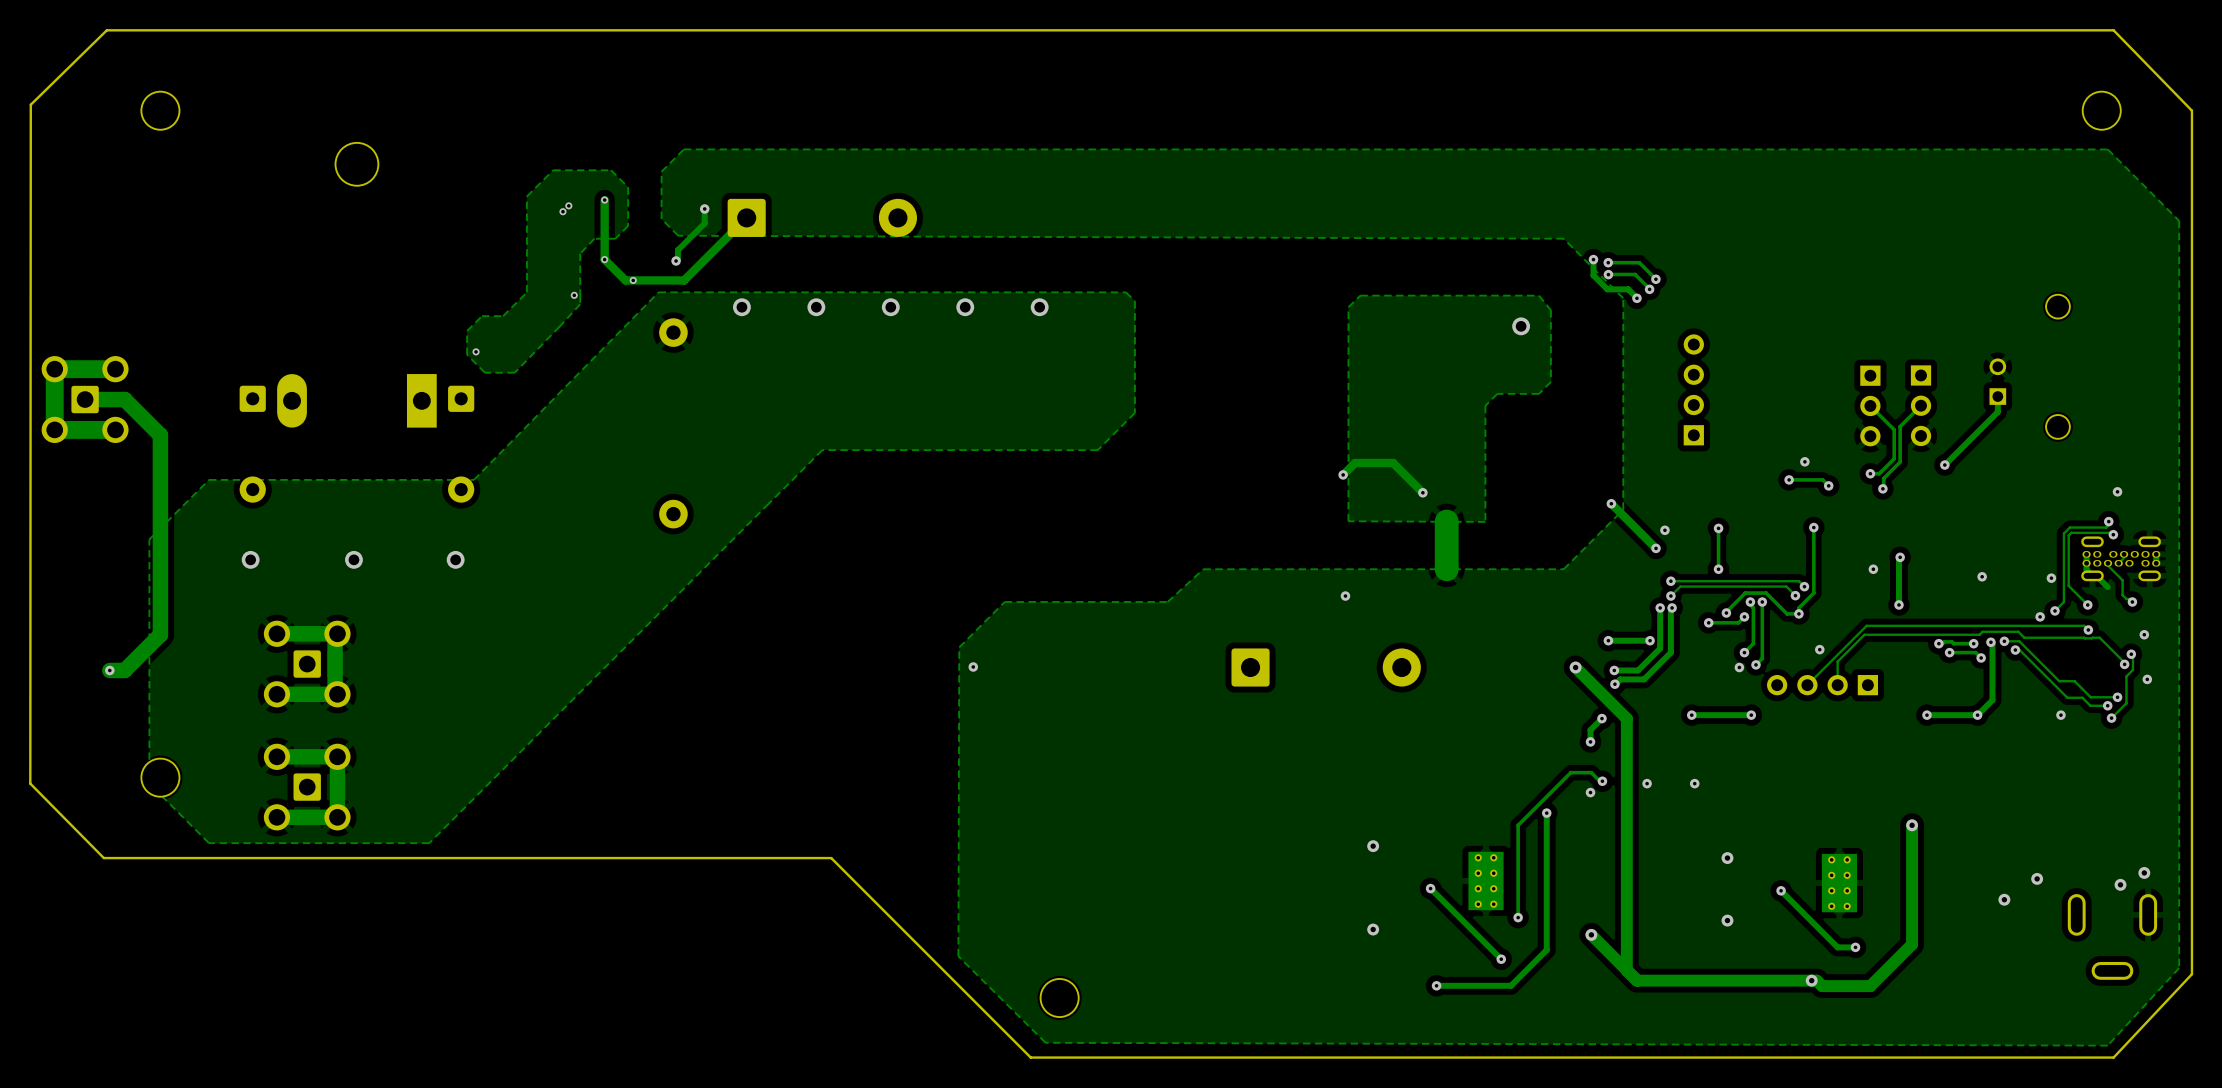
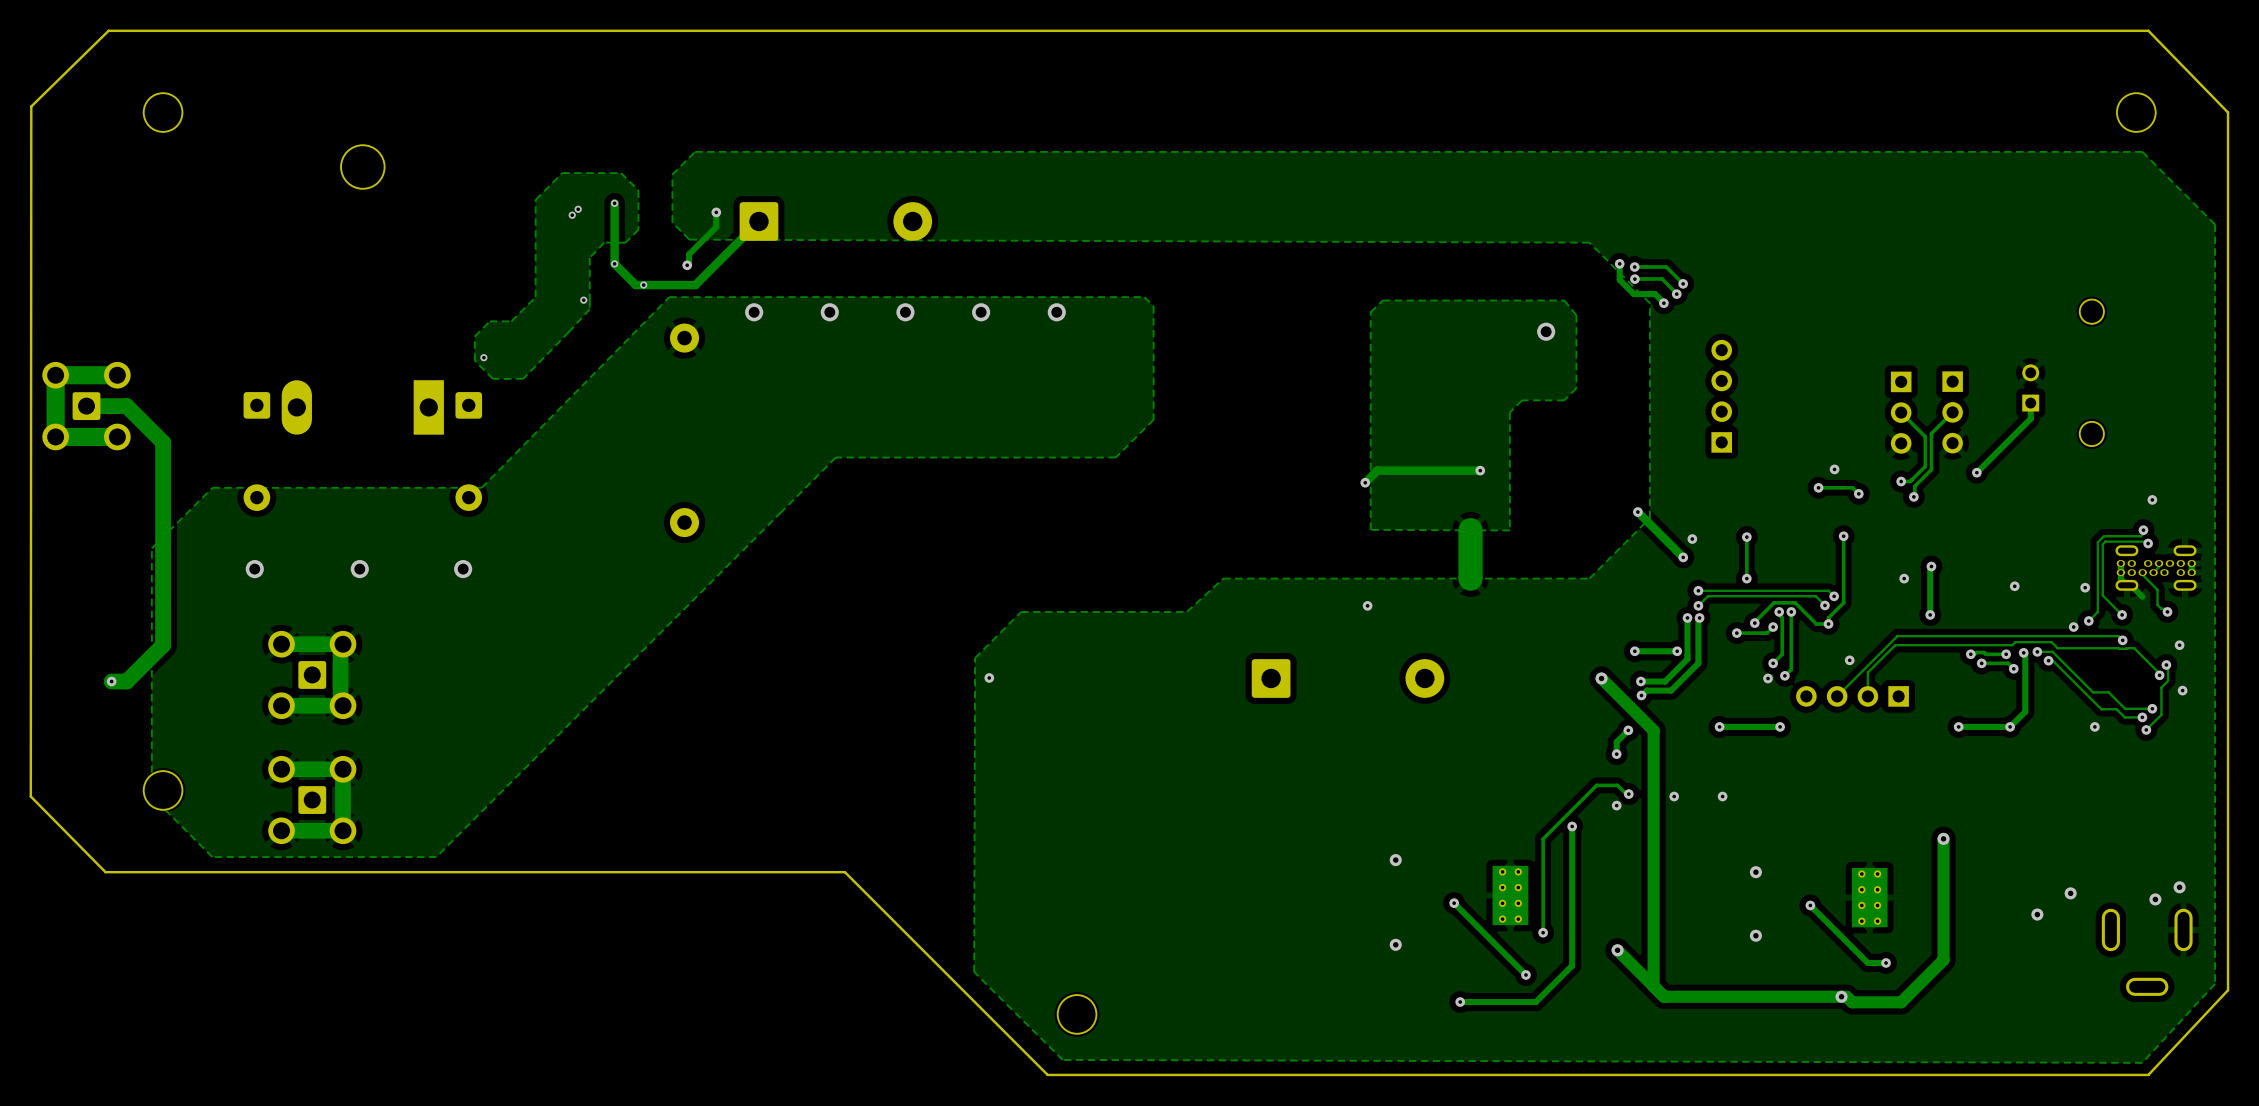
track: (1393, 463) (1422, 492) -> (1416, 470) (1480, 470)
via position: (1422, 492) -> (1480, 470)

